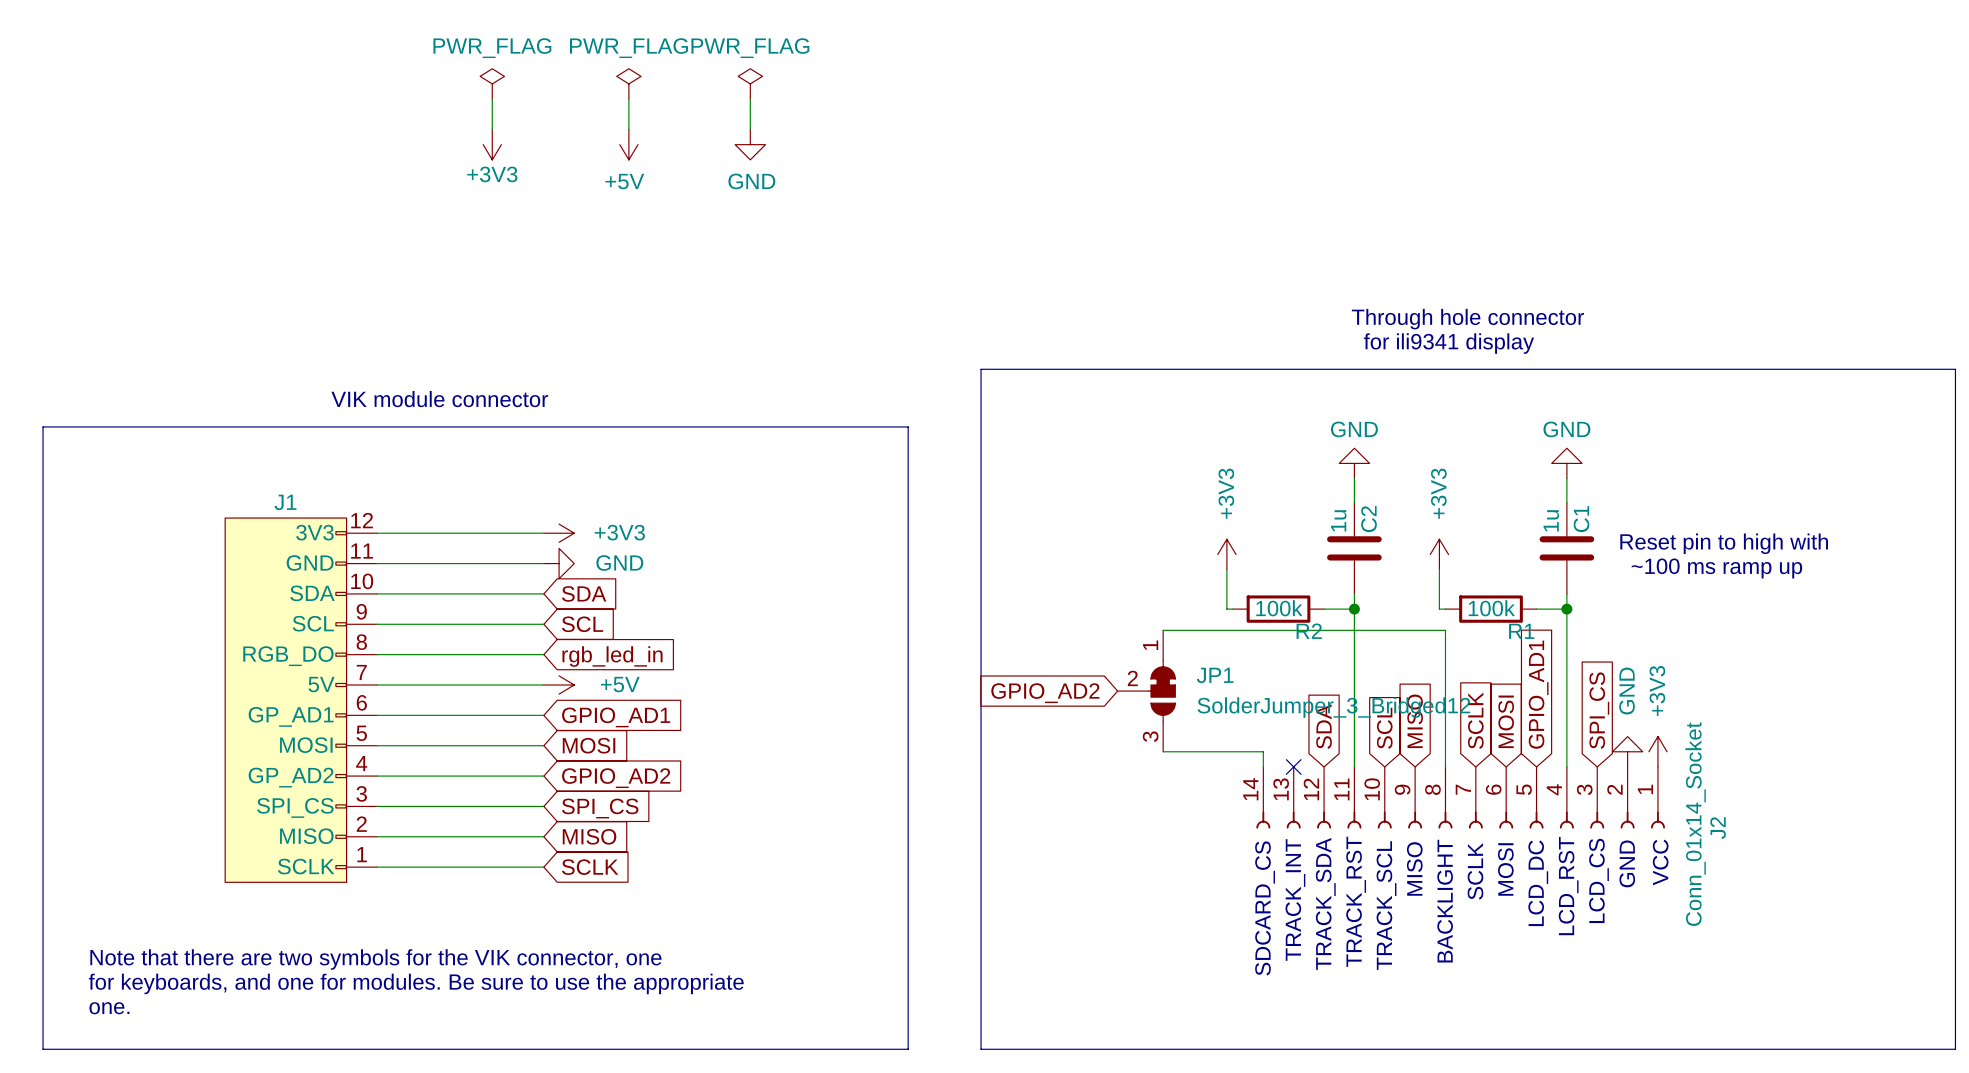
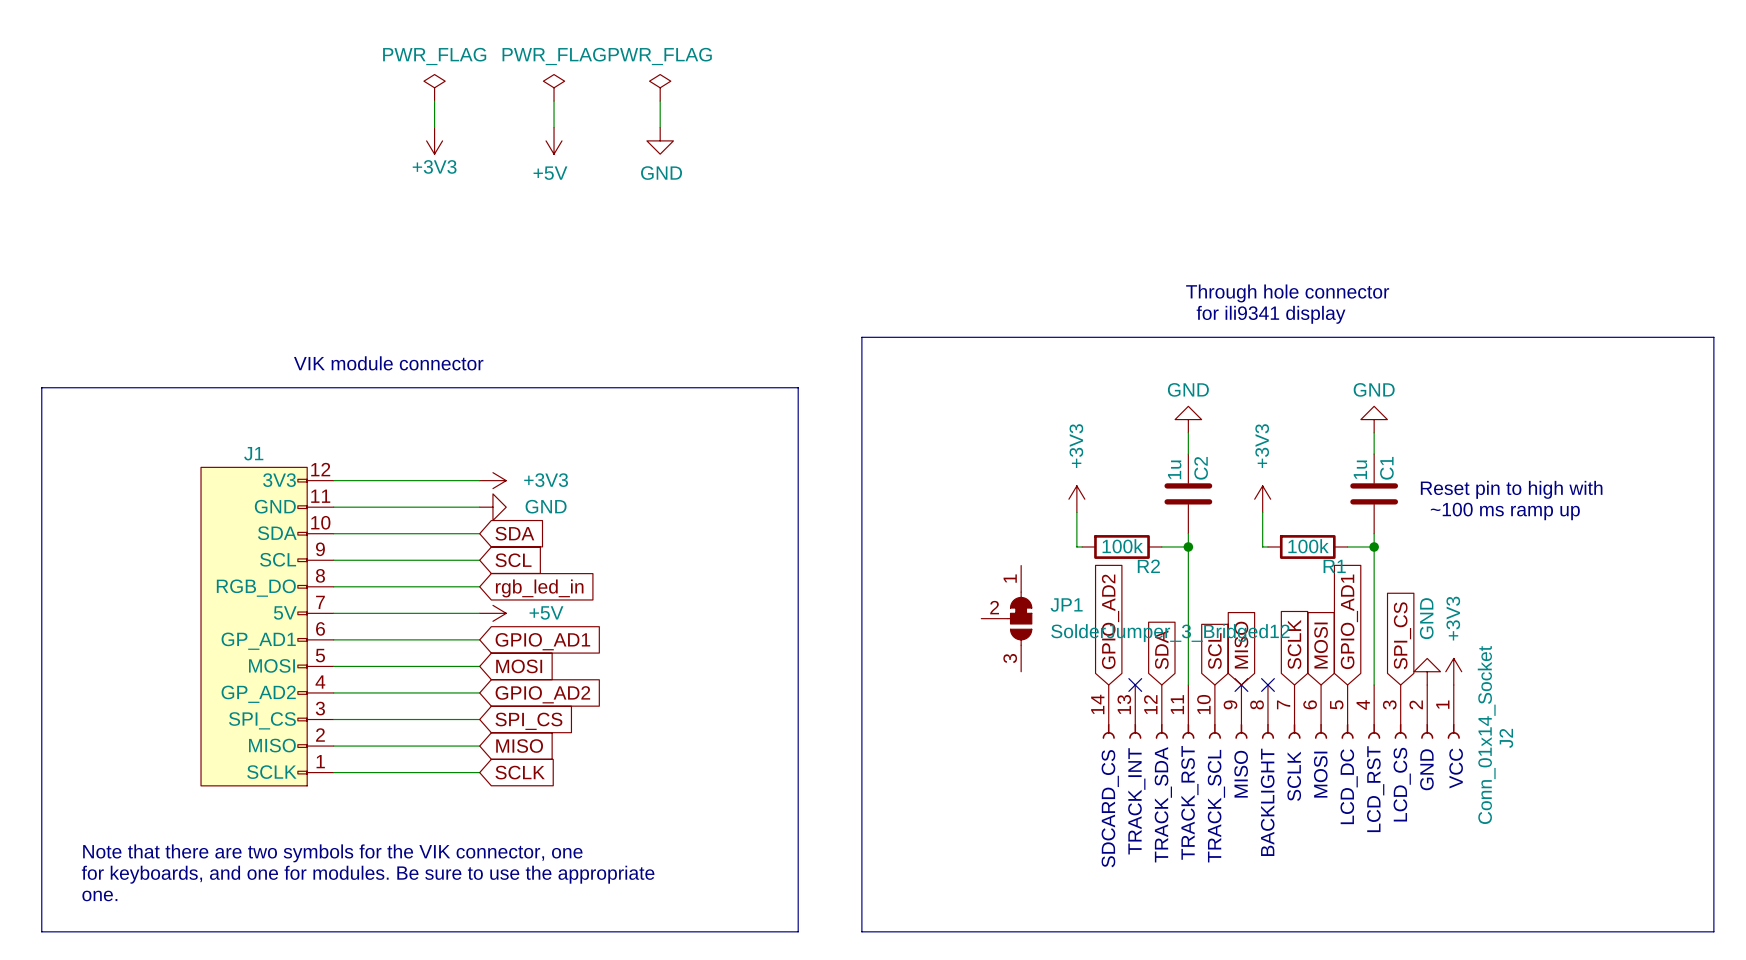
wire: (1163, 630) (1445, 630) (1445, 766) -> none
global label rotation: 0° (1045, 693) -> 90° clockwise (1110, 621)
global label position: GPIO_AD2 (1045, 693) -> GPIO_AD2 (1110, 621)
wire: (1163, 751) (1263, 751) (1263, 766) -> none
no-connect mark: none -> (1241, 685)
no-connect mark: none -> (1267, 685)

